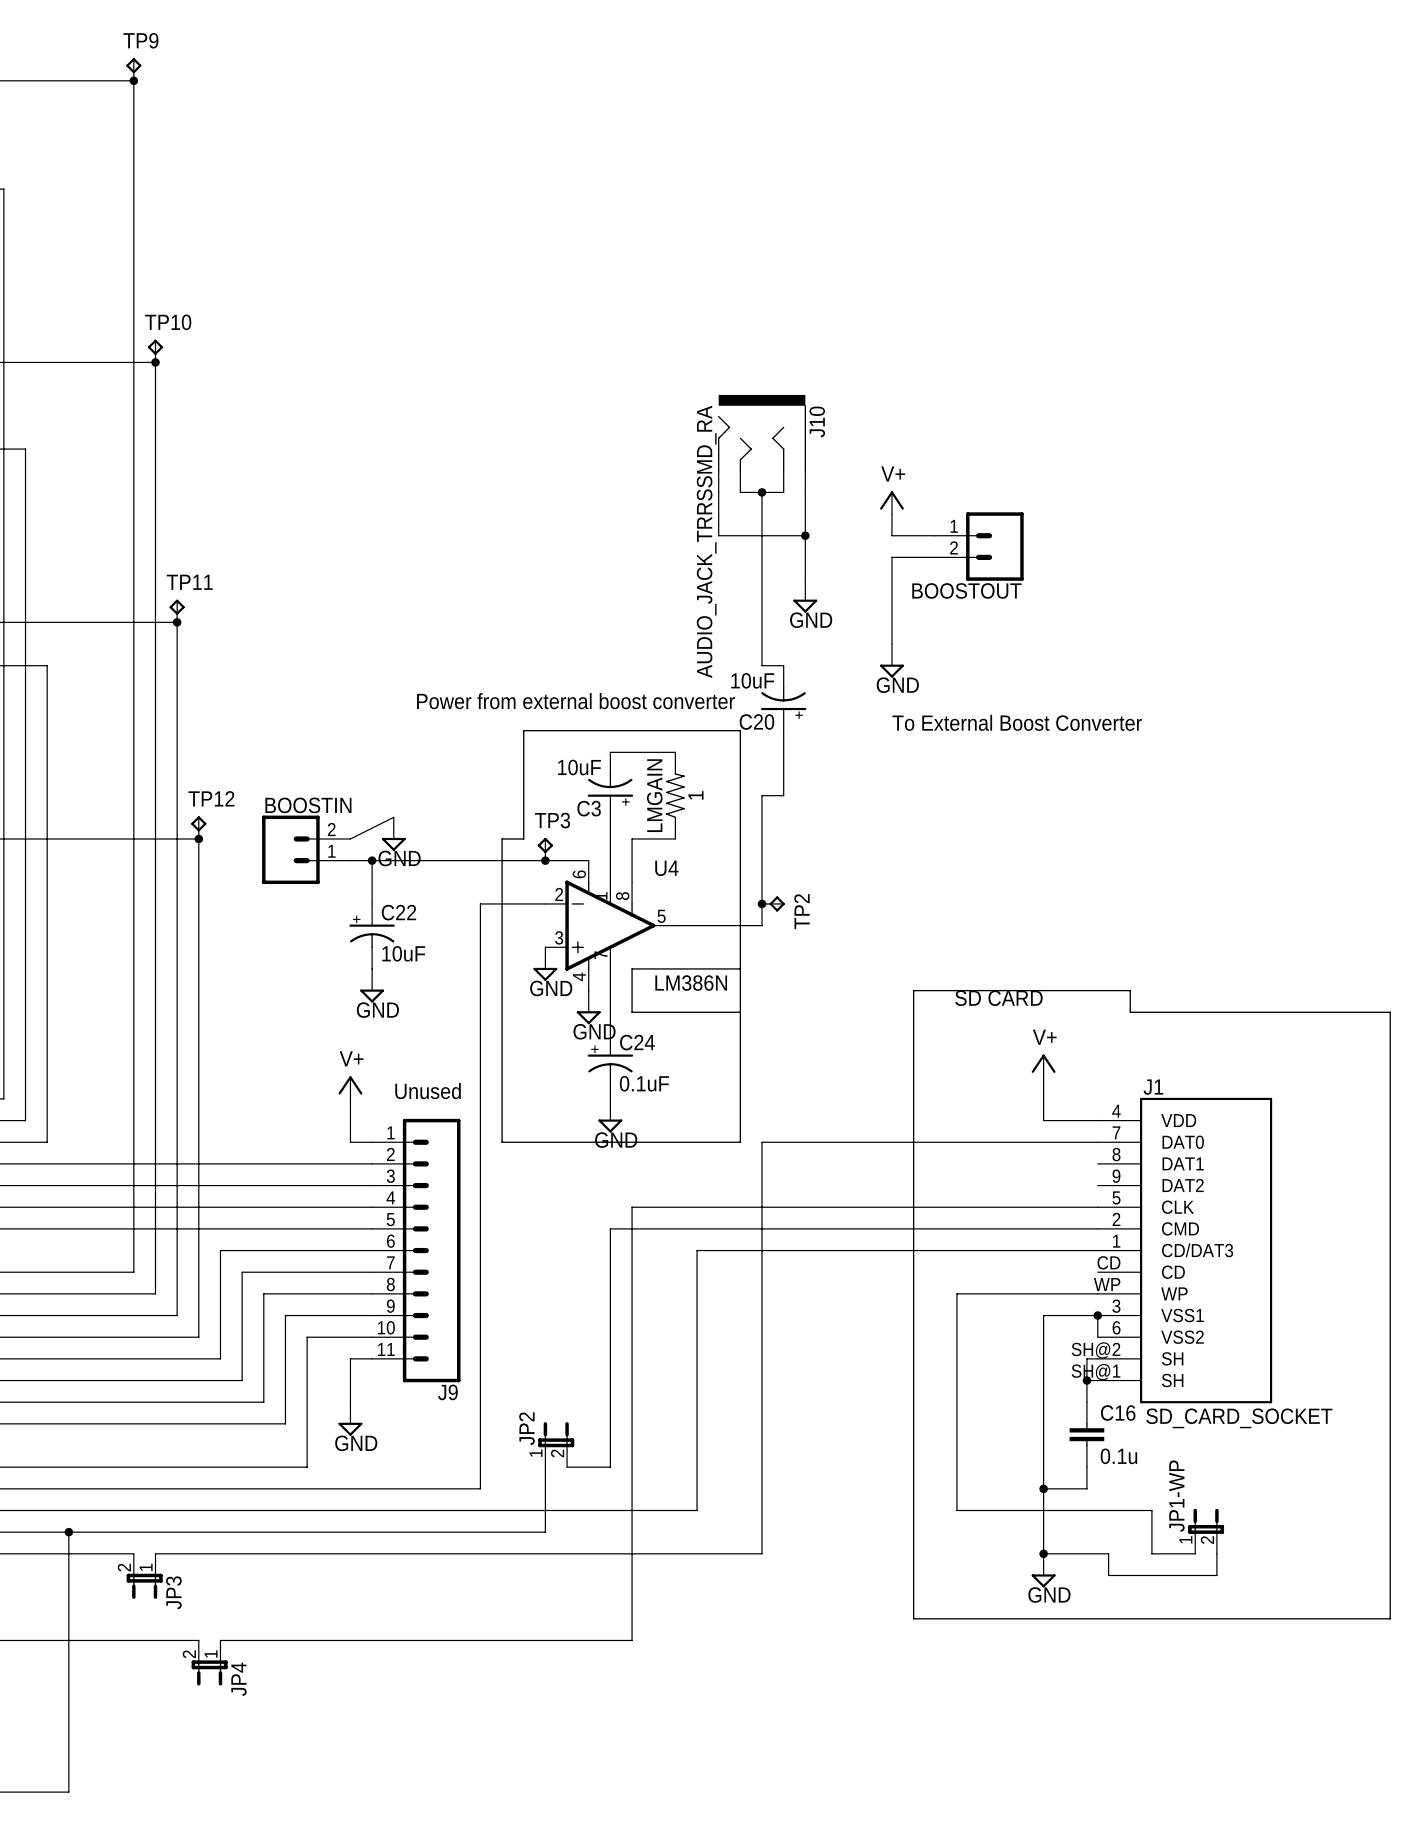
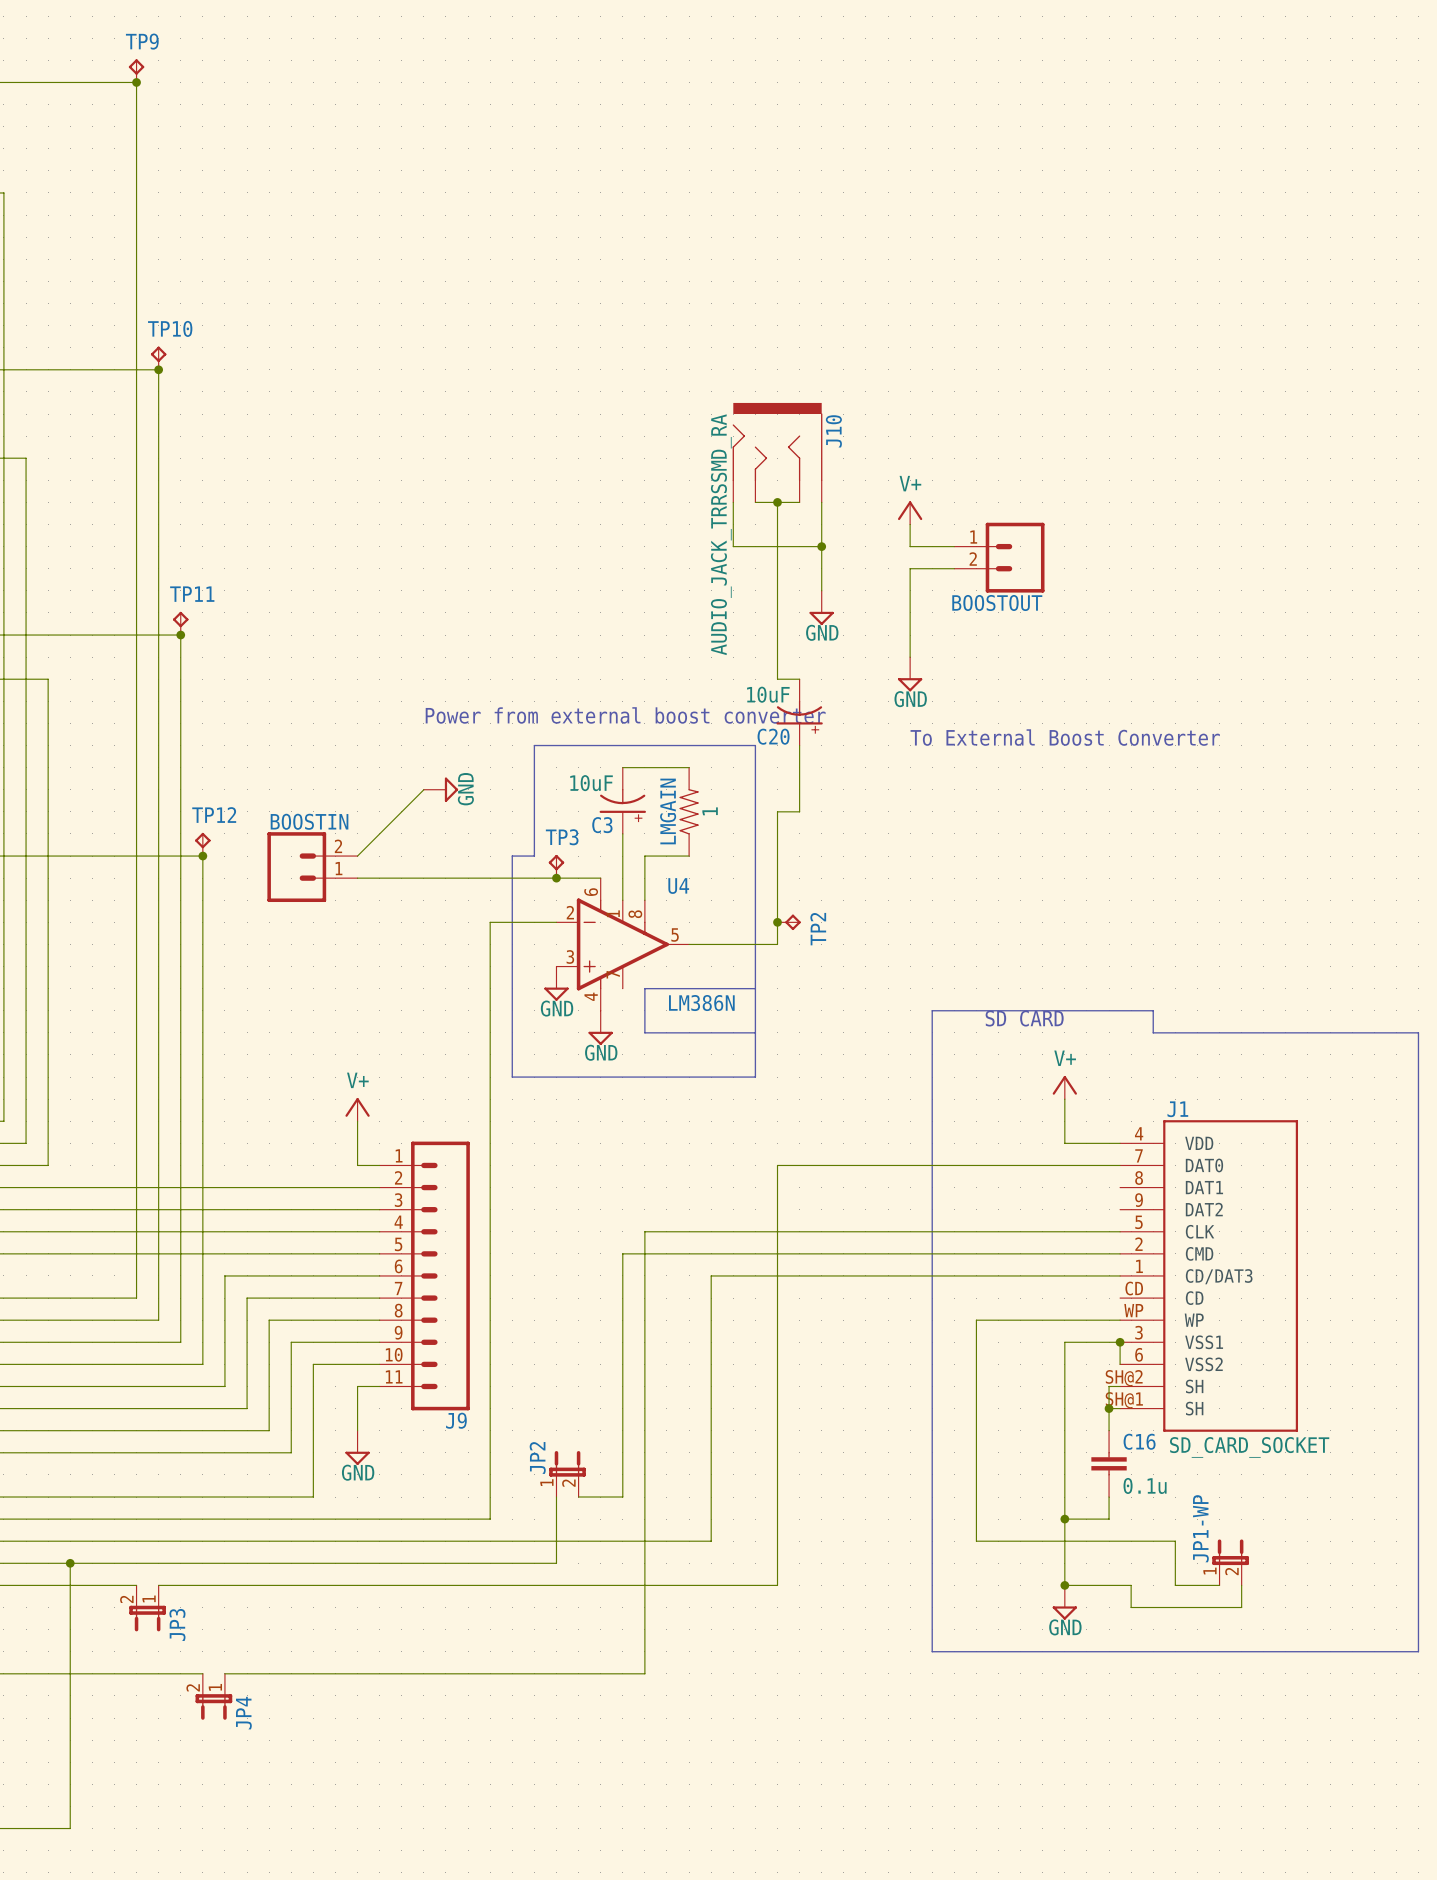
wire: (393, 817) (350, 838) -> (423, 789) (357, 856)
power symbol position: GND (393, 834) -> GND (441, 789)
power symbol rotation: 0° (393, 844) -> 90° counterclockwise (451, 789)
wire: (372, 860) (372, 903) -> none
junction: (372, 860) -> none
C22: 10uF (372, 936) -> none
wire: (610, 968) (610, 1033) -> none
power symbol: GND (372, 985) -> none
line: (502, 1055) (502, 1142) (740, 1142) (740, 1055) -> (512, 1077) (755, 1077)
C24: 0.1uF (610, 1066) -> none
text: Unused (428, 1091) -> none
power symbol: GND (610, 1115) -> none

